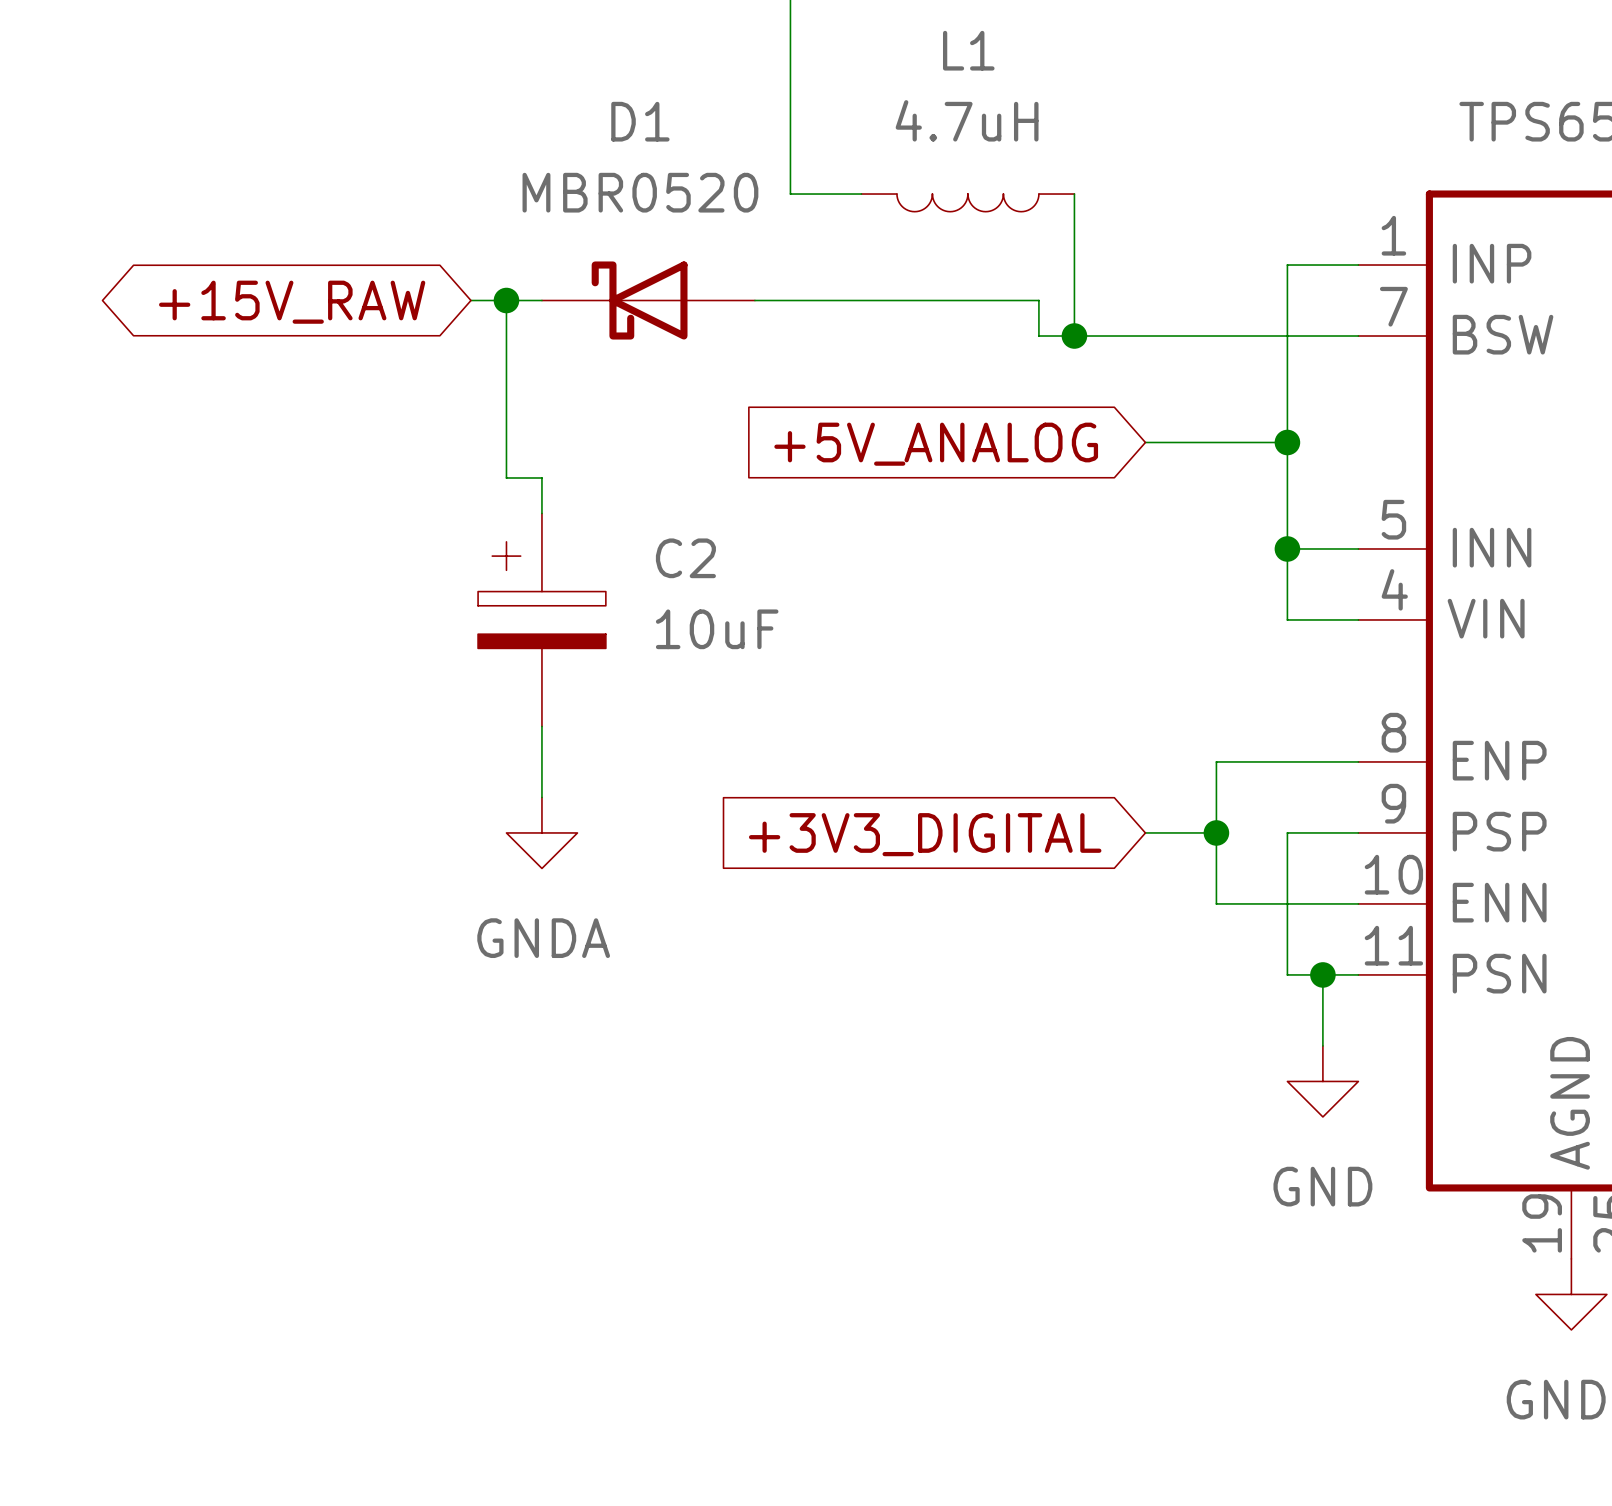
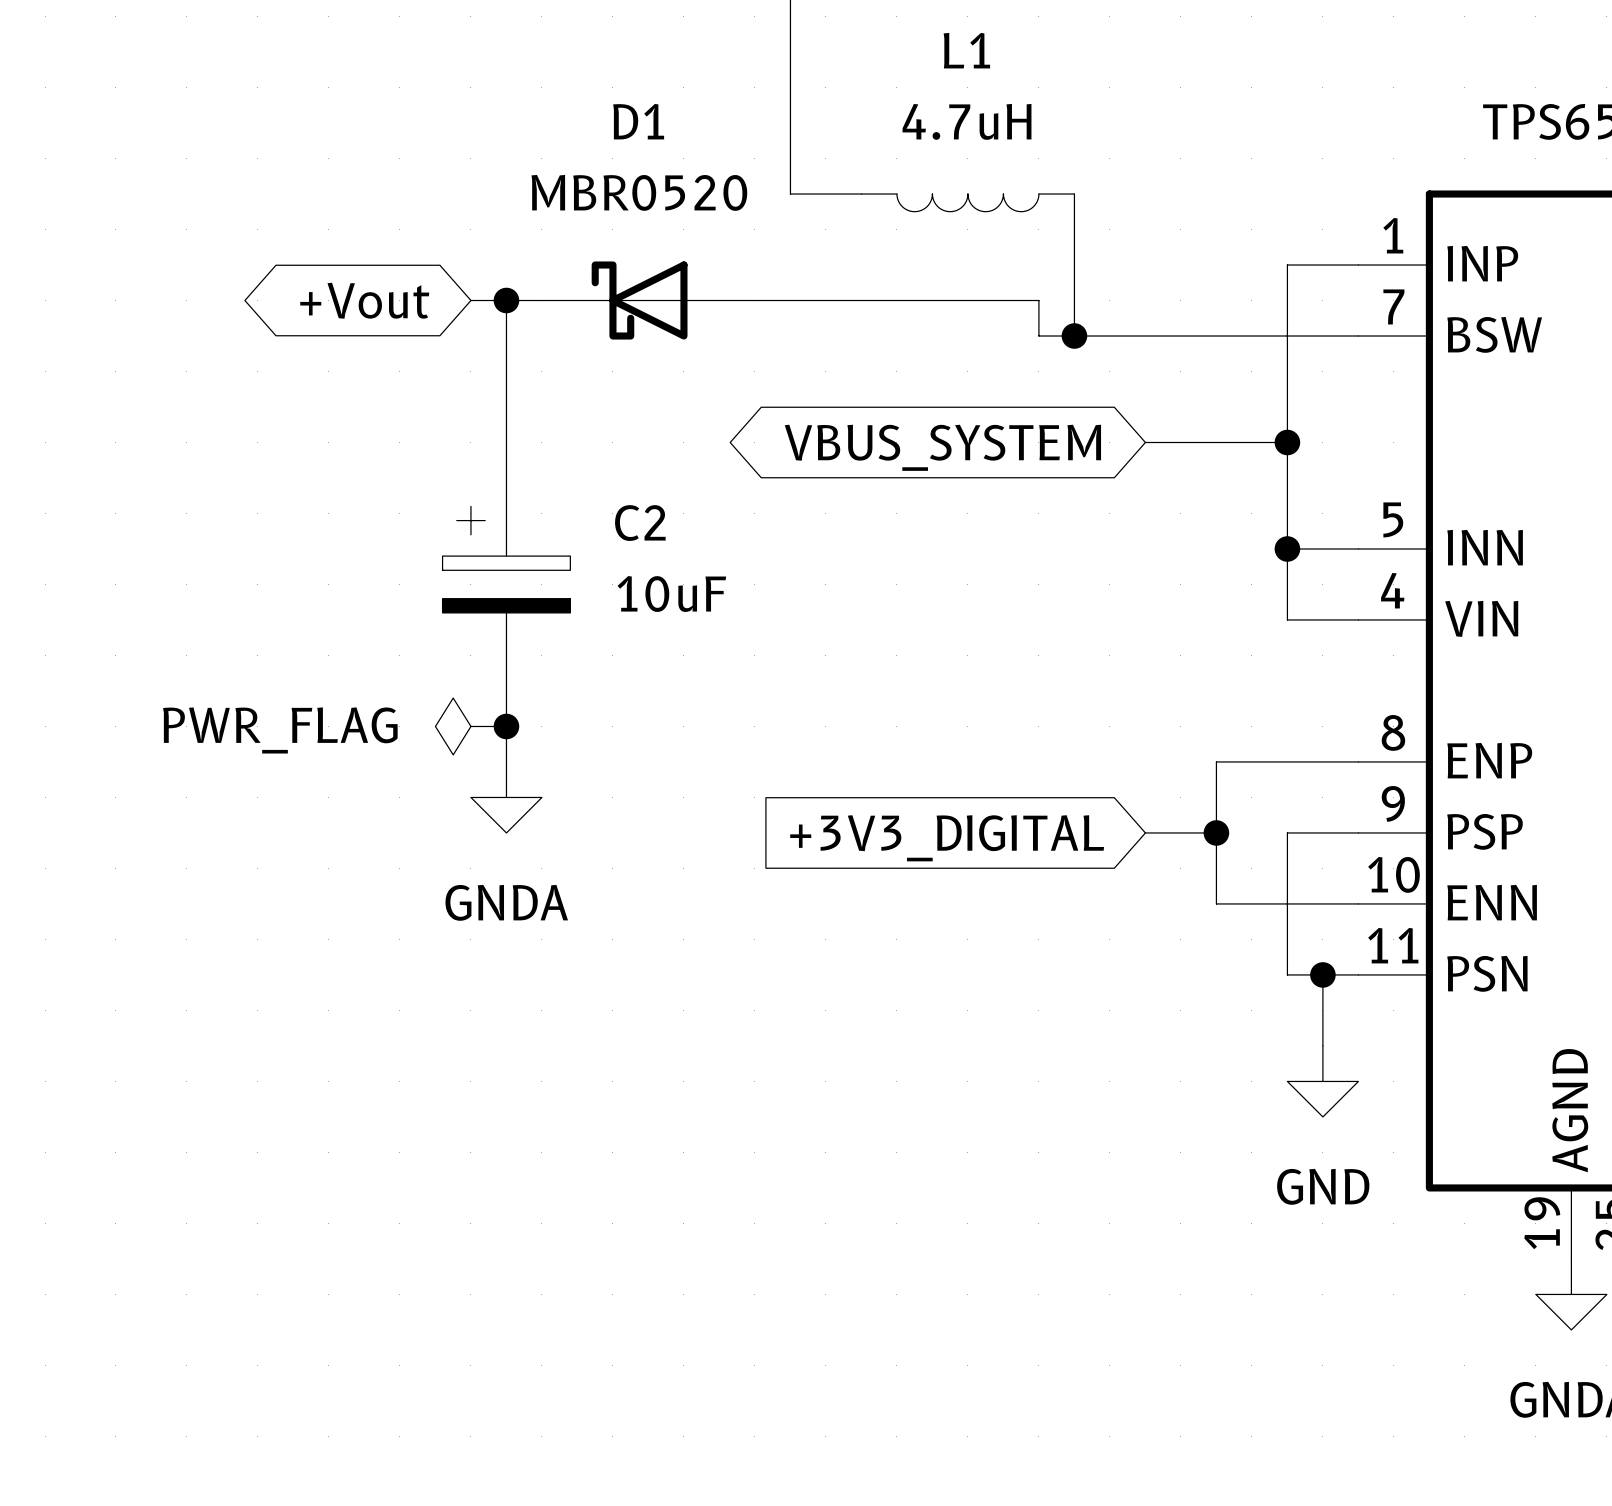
global label: +15V_RAW (292, 302) -> +Vout (364, 300)
global label shape: input (936, 444) -> bidirectional (942, 447)
global label: +5V_ANALOG (936, 444) -> VBUS_SYSTEM (942, 447)
wire: (506, 477) (541, 477) (541, 513) -> none
C2 position: (541, 619) -> (506, 584)
power symbol: none -> PWR_FLAG (470, 726)
junction: none -> (506, 726)
wire: (541, 726) (541, 797) -> (506, 690) (506, 761)
power symbol position: GNDA (541, 832) -> GNDA (506, 797)

